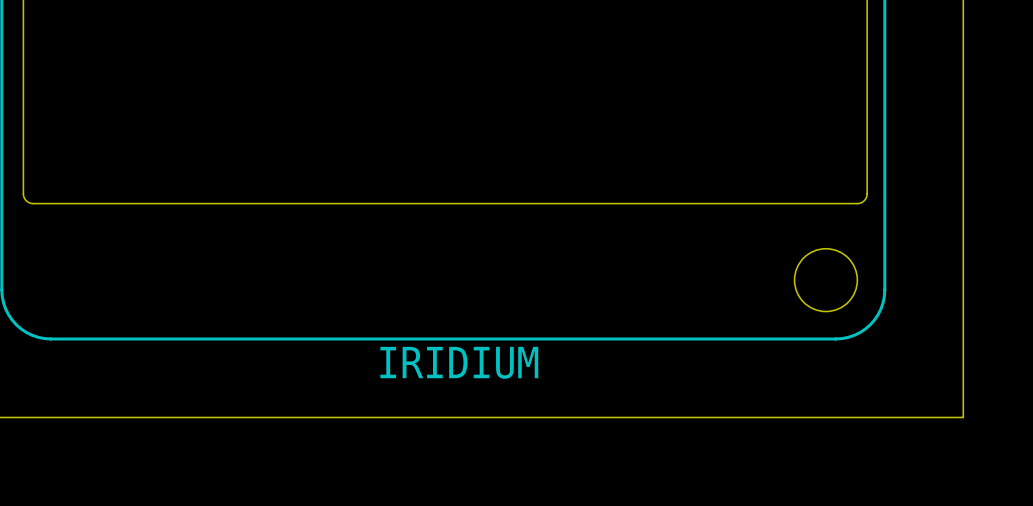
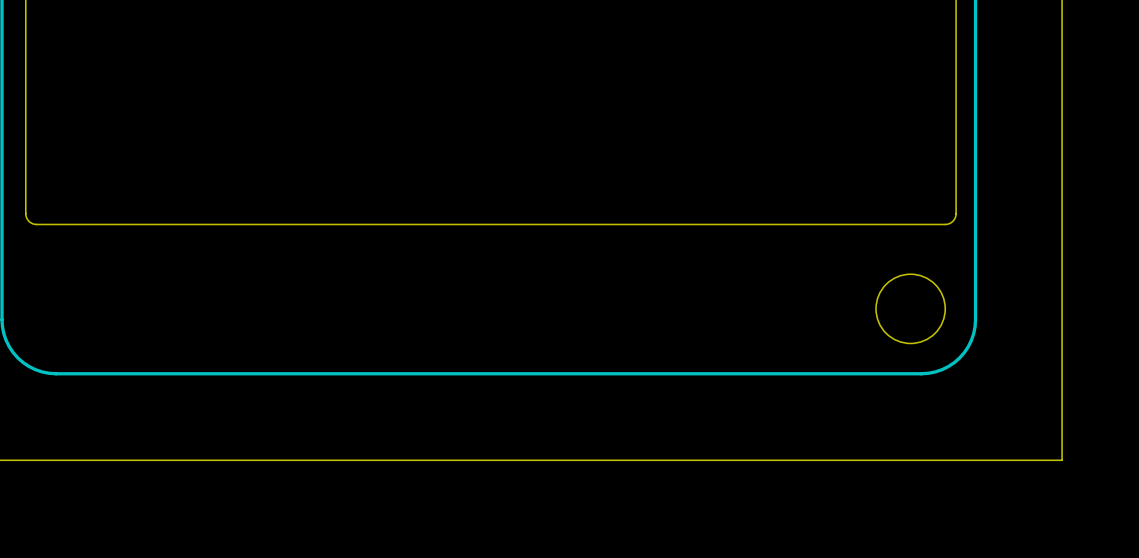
text: IRIDIUM (459, 362) -> none

